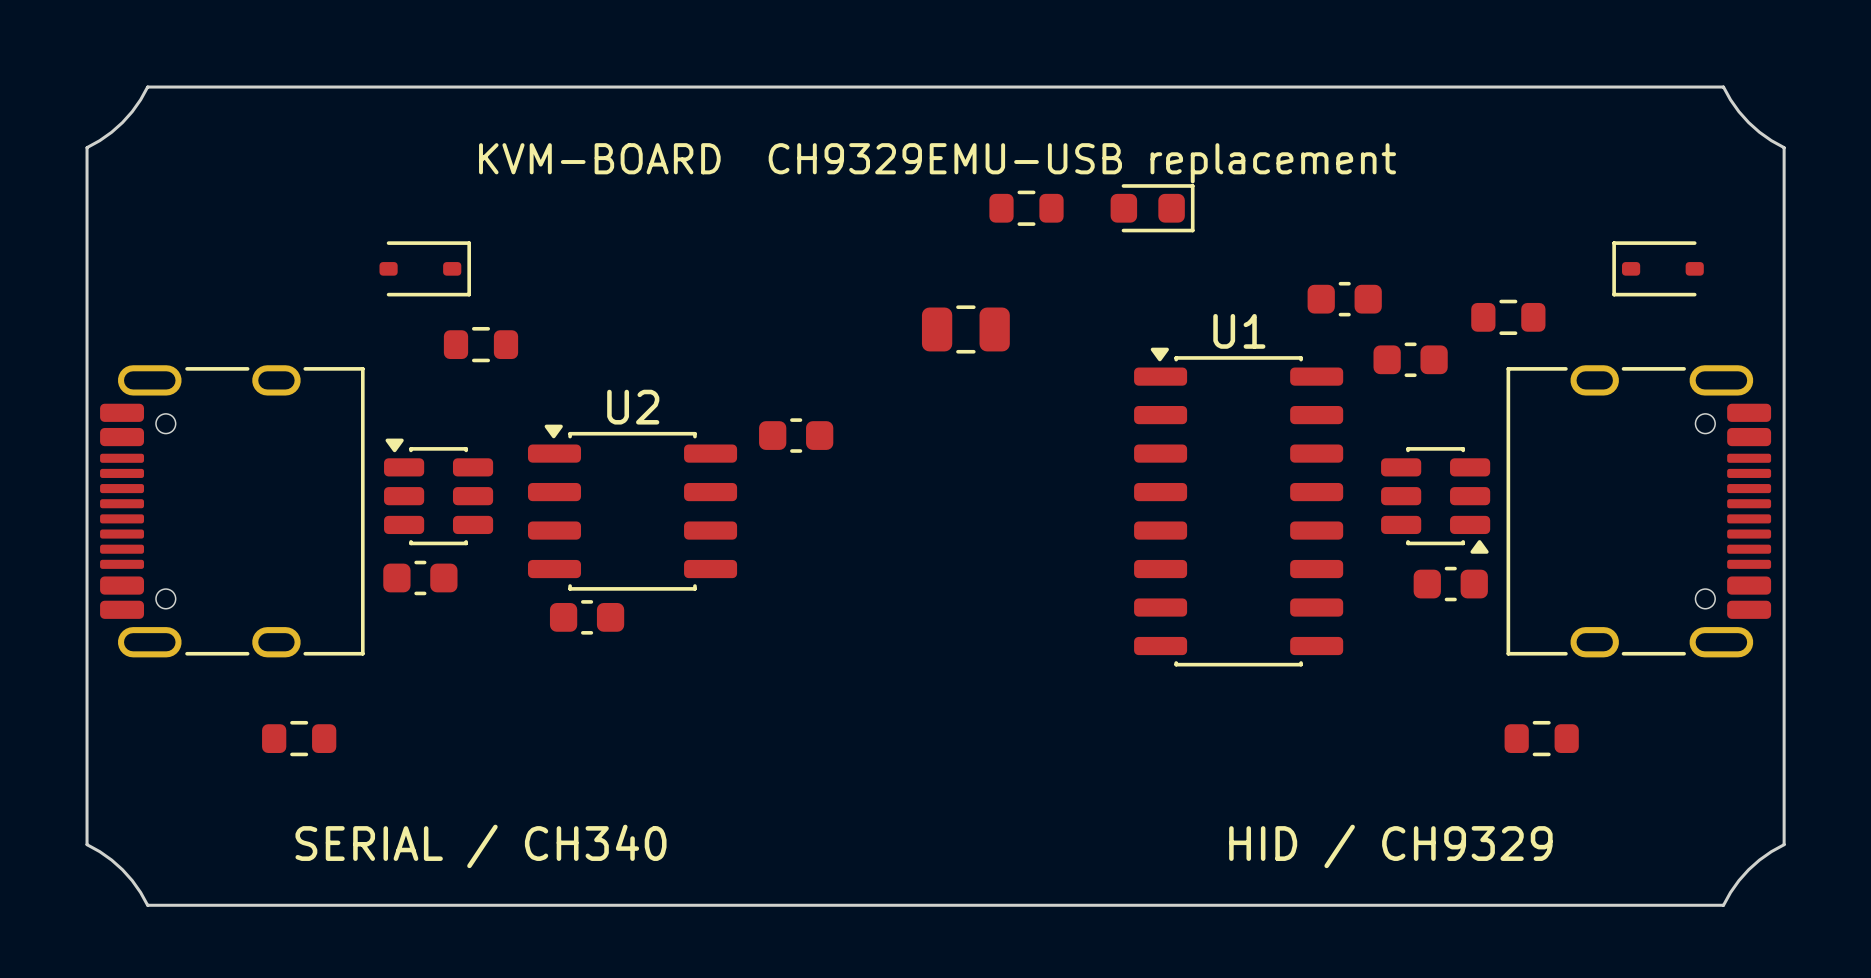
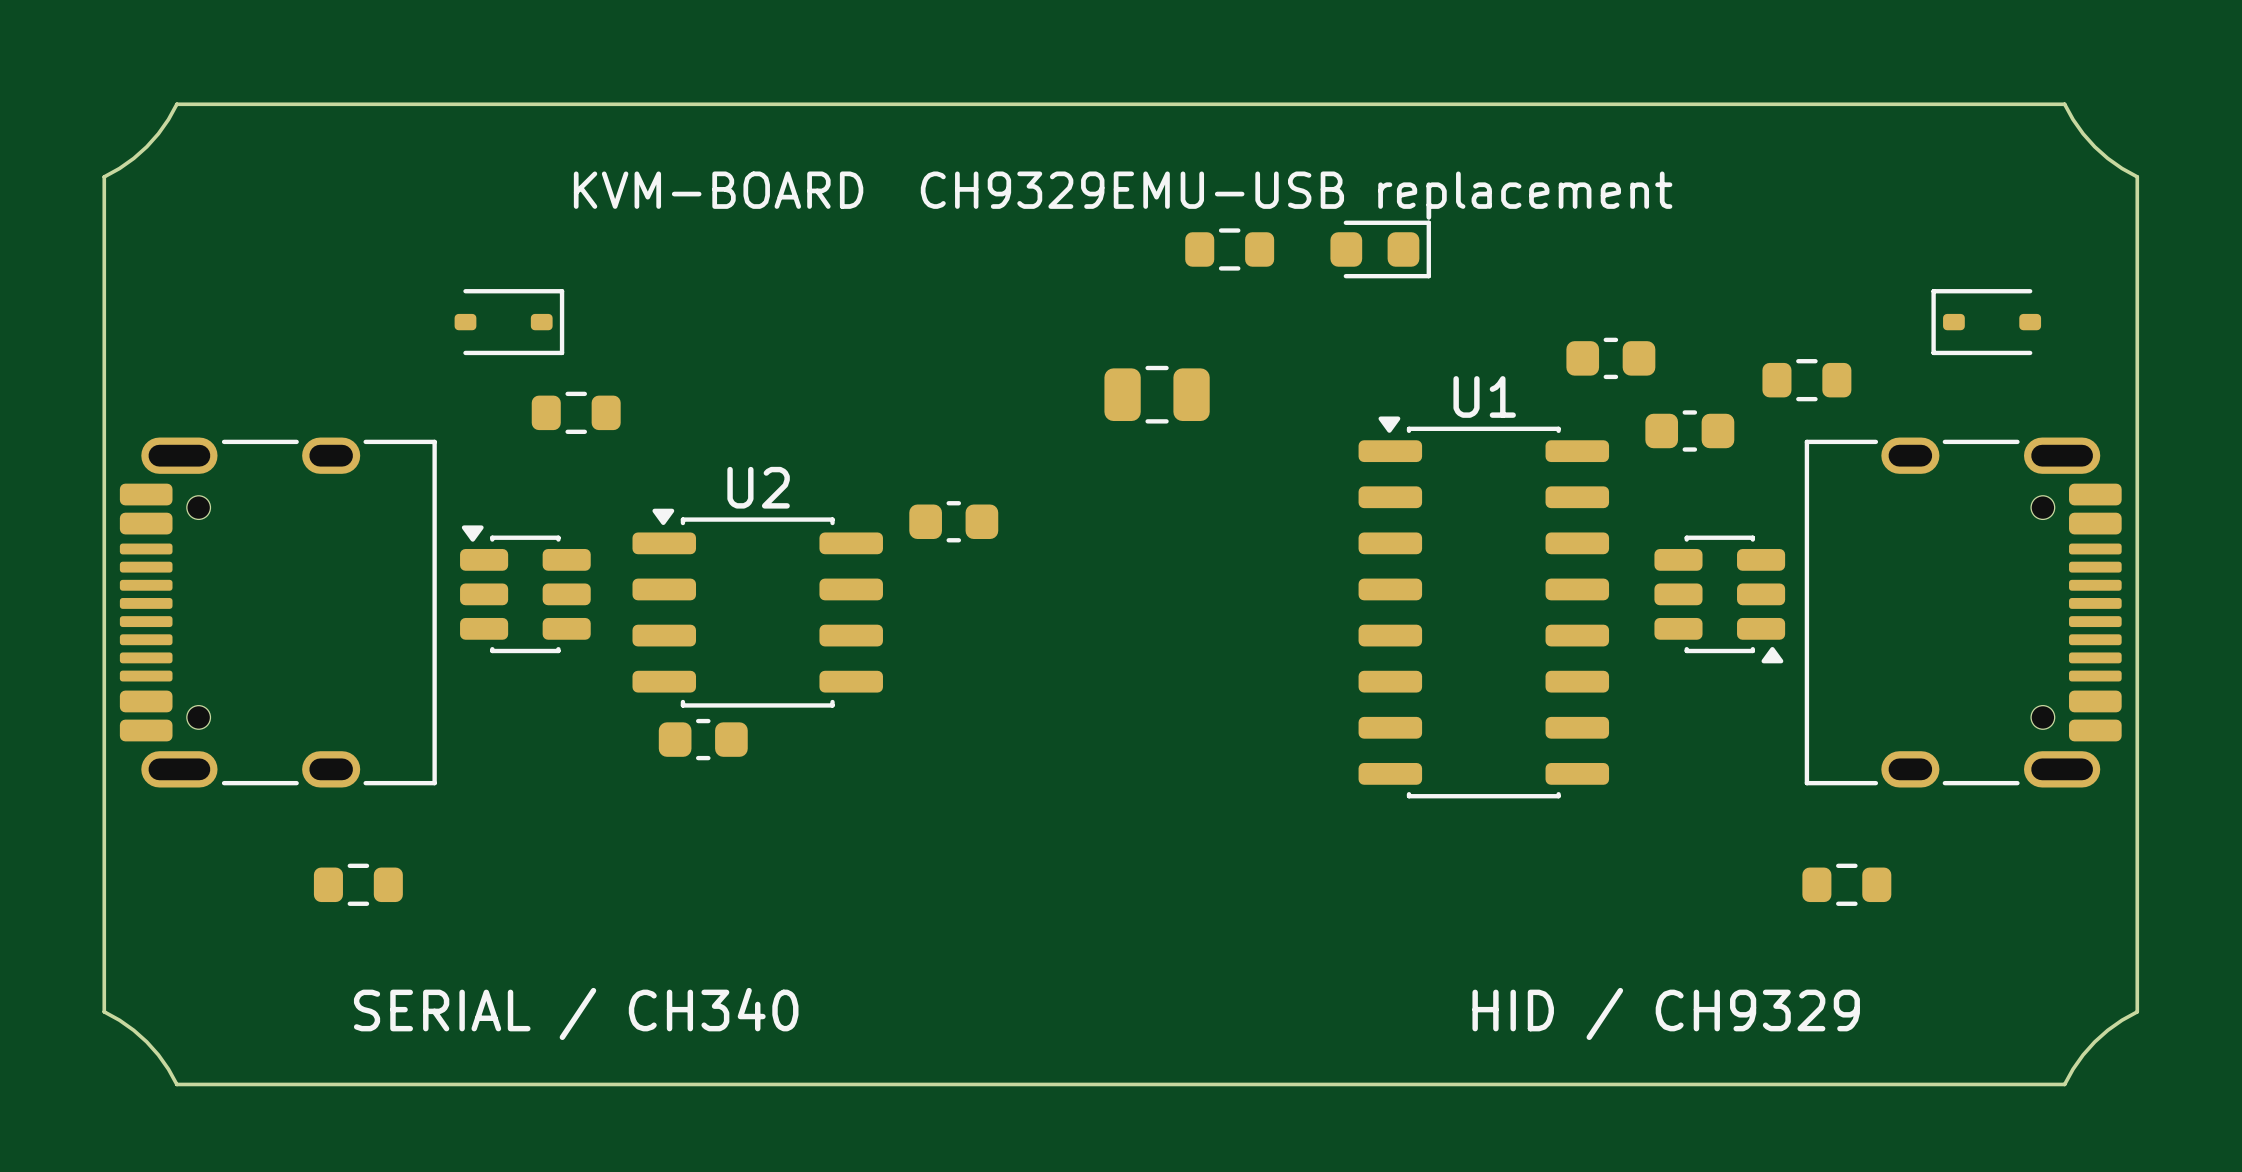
part: (420, 577) -> none
part: (1450, 584) -> none

